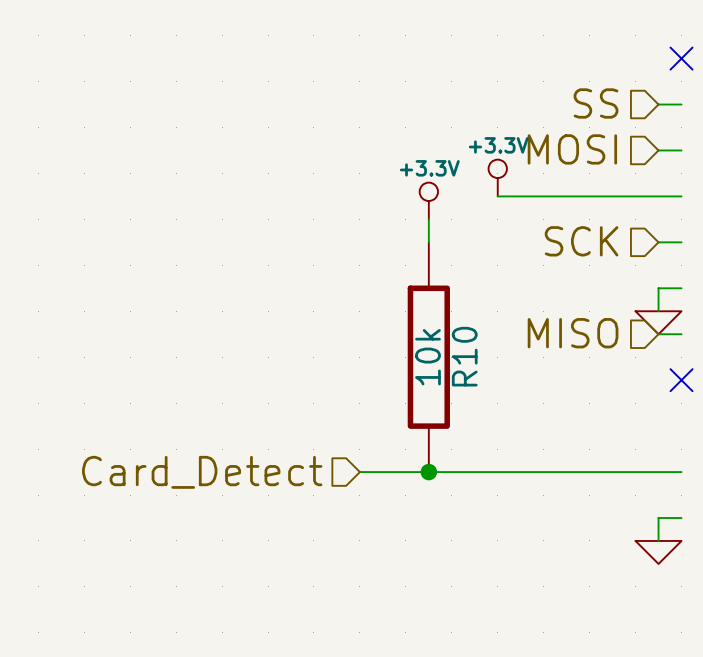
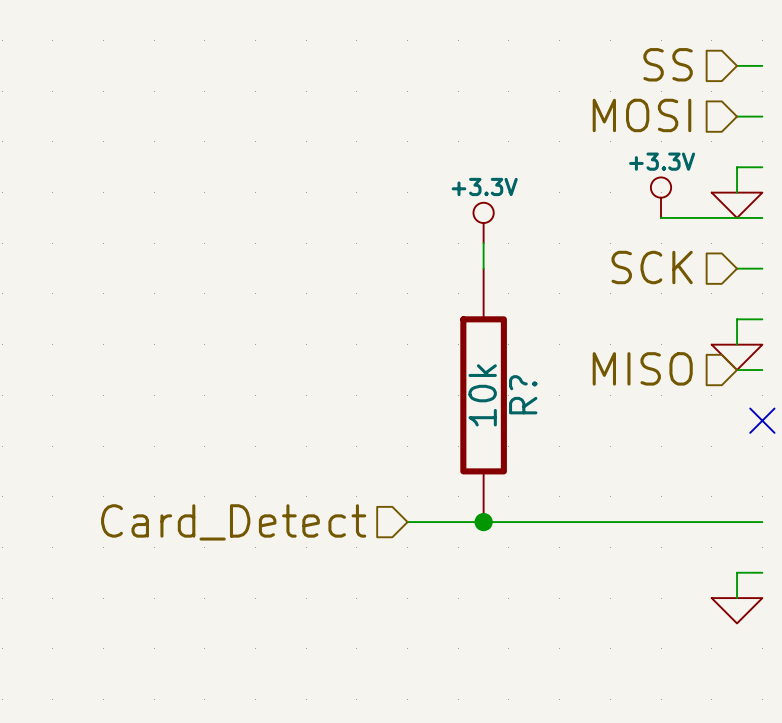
hierarchical label: none -> SS (668, 64)
wire: none -> (737, 65) (762, 65)
no-connect mark: (681, 58) -> none
hierarchical label: SS (596, 103) -> MOSI (641, 115)
hierarchical label: MOSI (572, 149) -> none
wire: none -> (737, 167) (737, 192)
power symbol position: +3.3V (497, 178) -> +3.3V (661, 197)
power symbol: none -> (737, 205)
wire: (497, 196) (589, 196) -> none
R10 name: R10 (464, 356) -> R? (523, 394)

